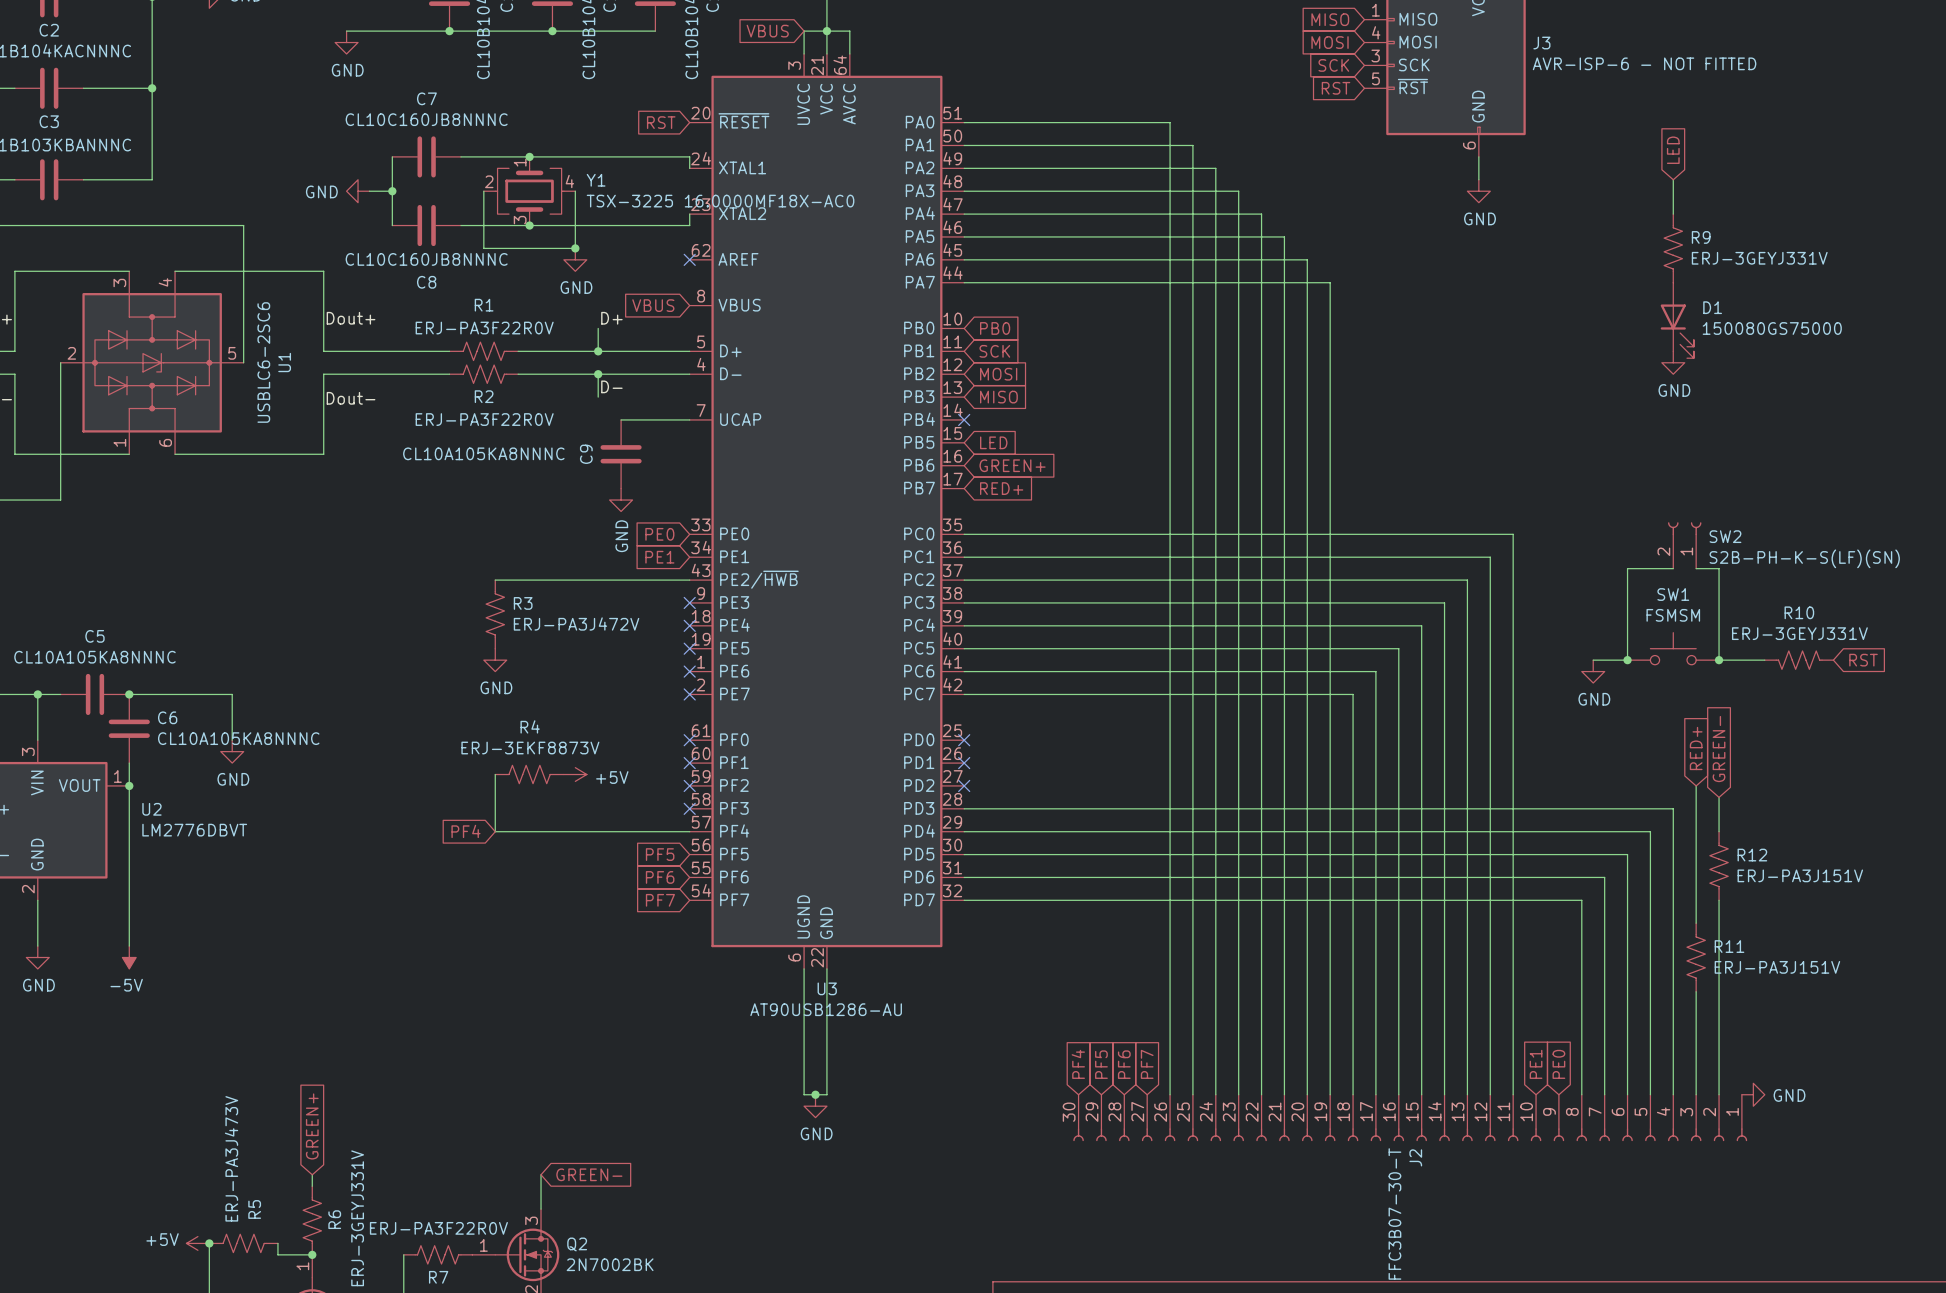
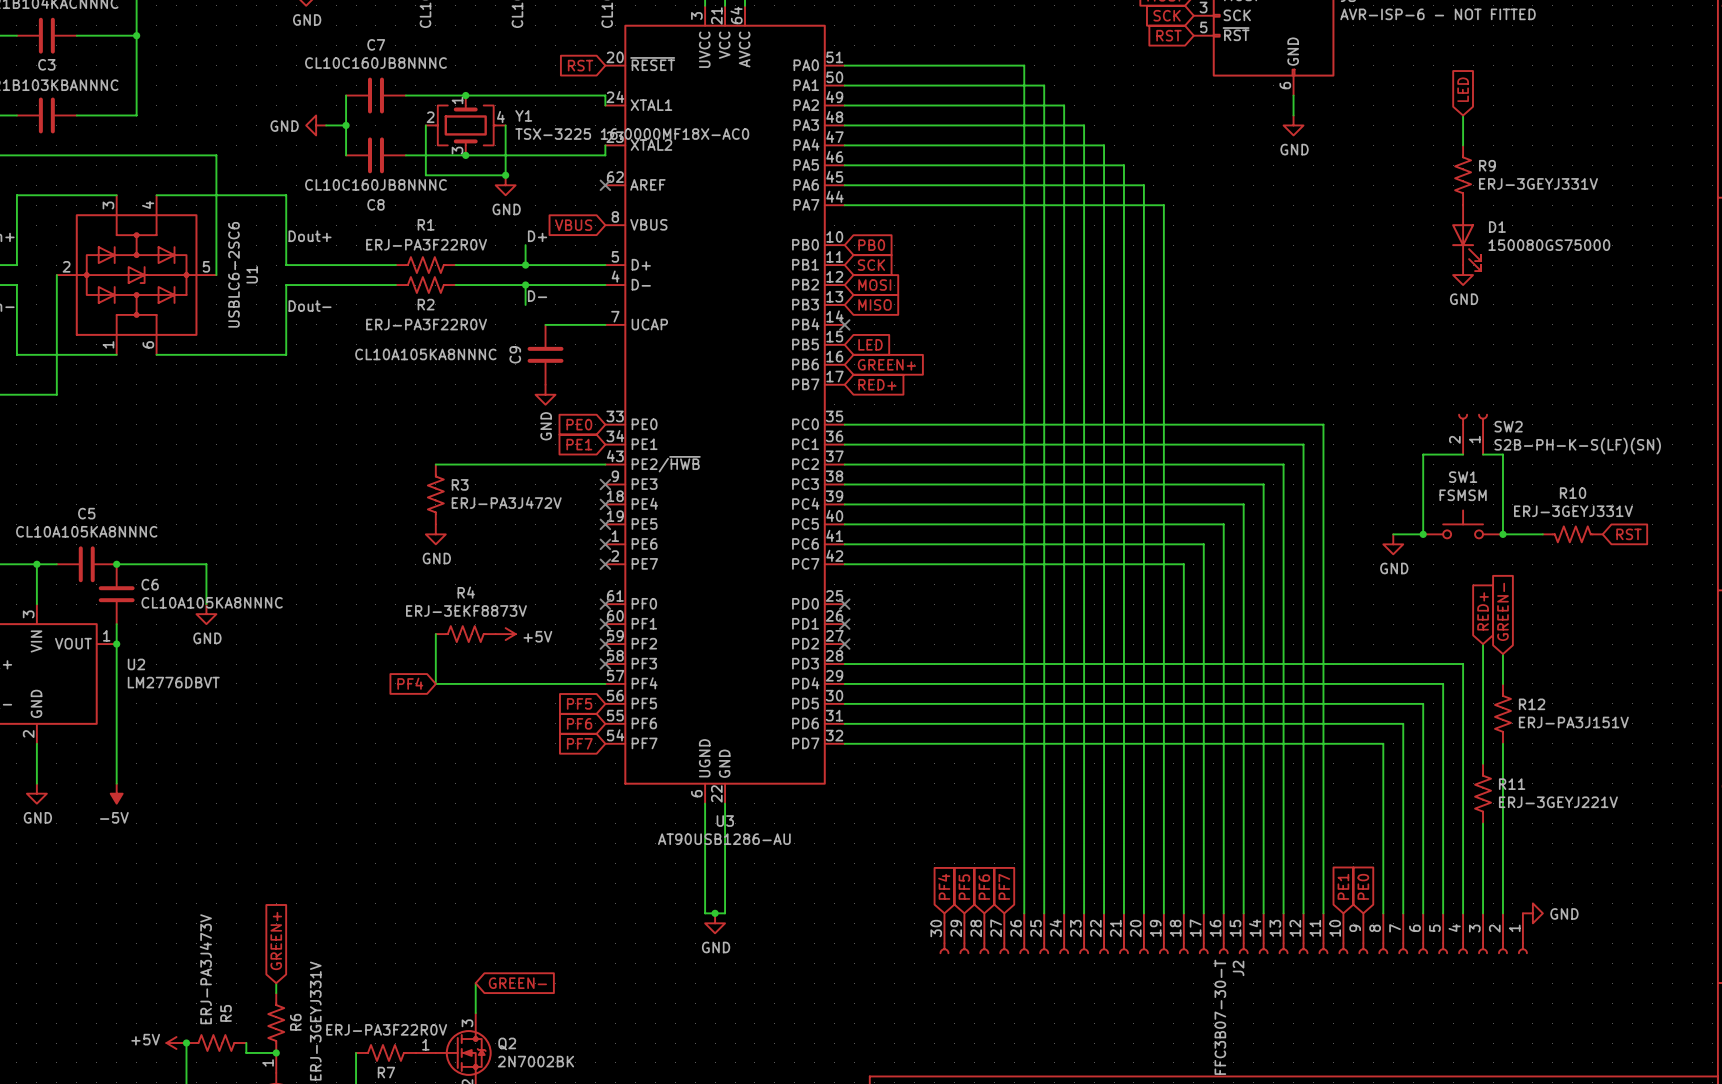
R11 value: ERJ-PA3J151V (1777, 967) -> ERJ-3GEYJ221V (1558, 802)

